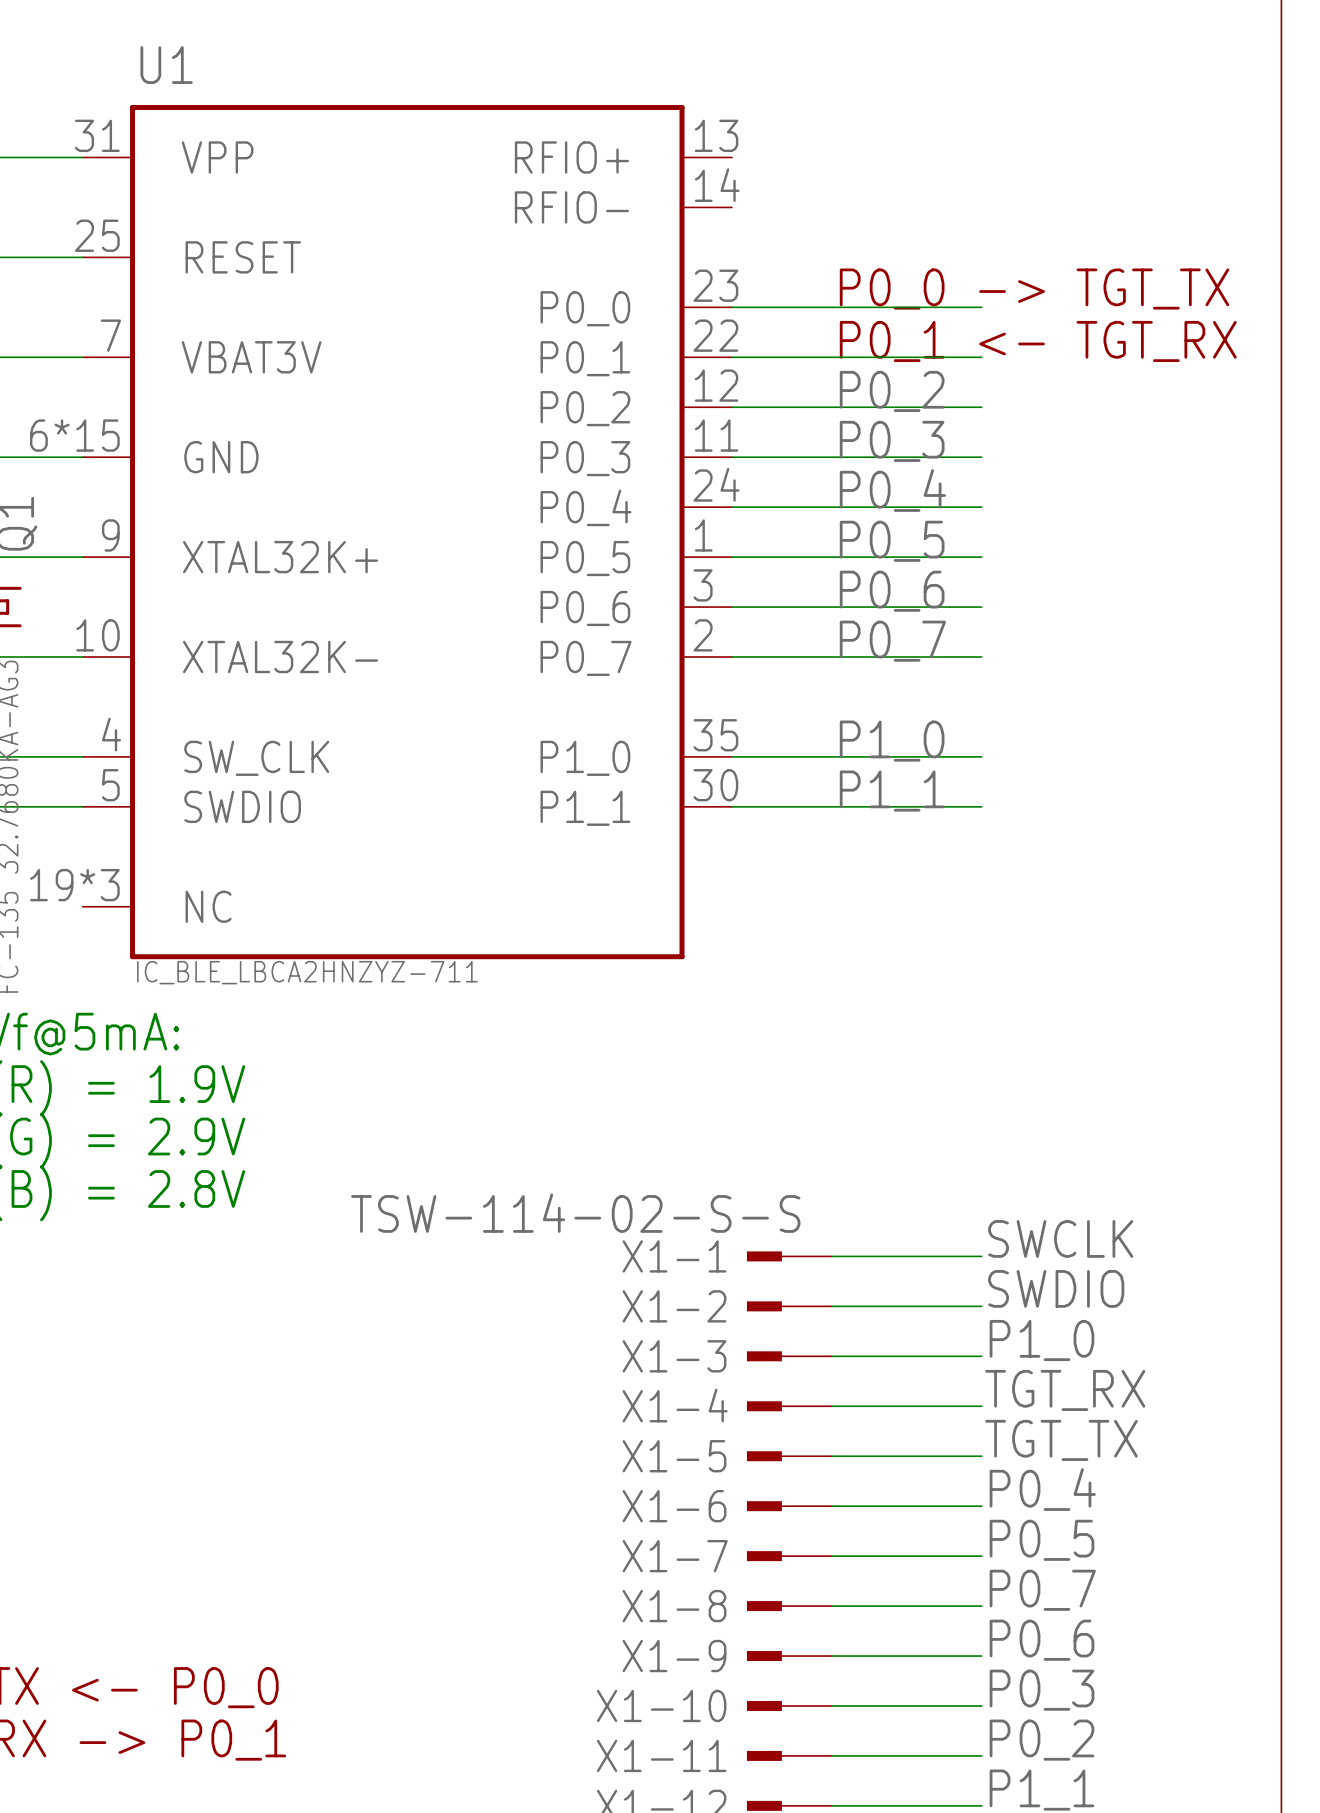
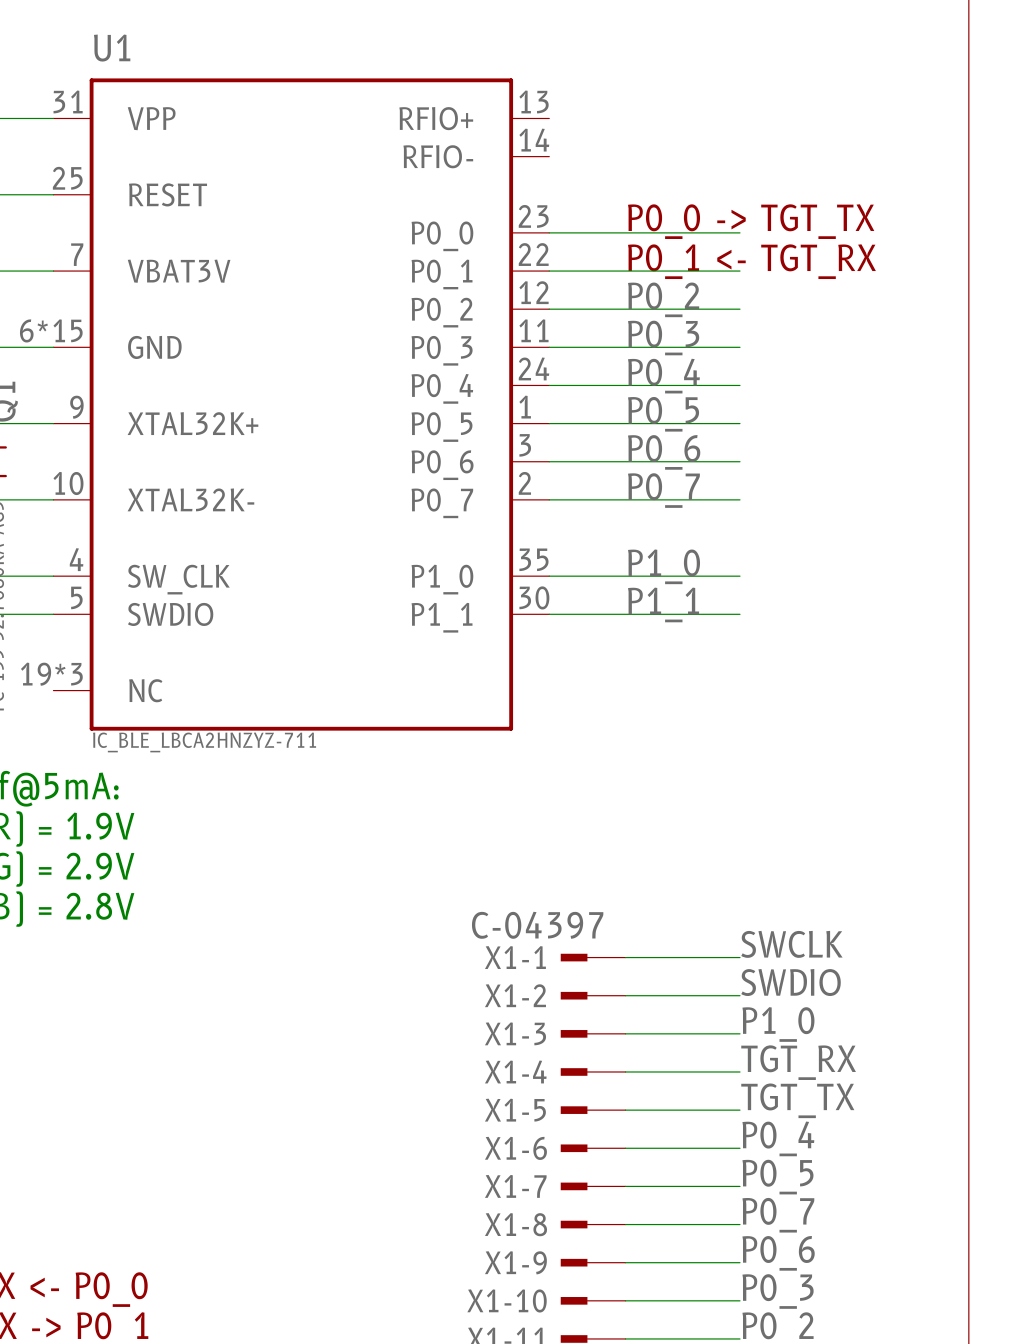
X1-1 value: TSW-114-02-S-S (575, 1213) -> C-04397 (537, 925)

